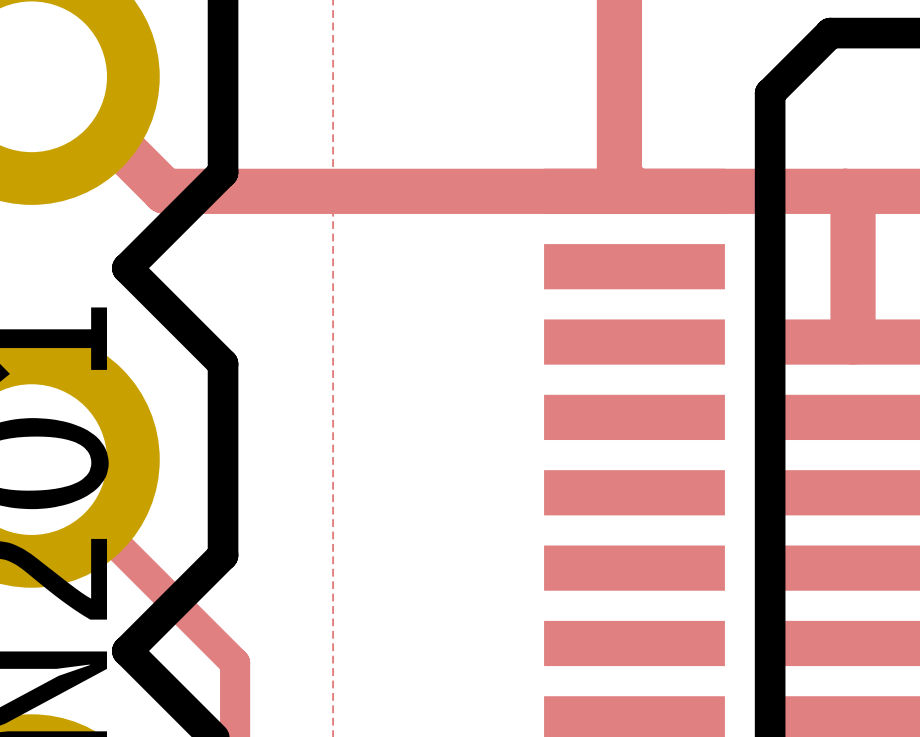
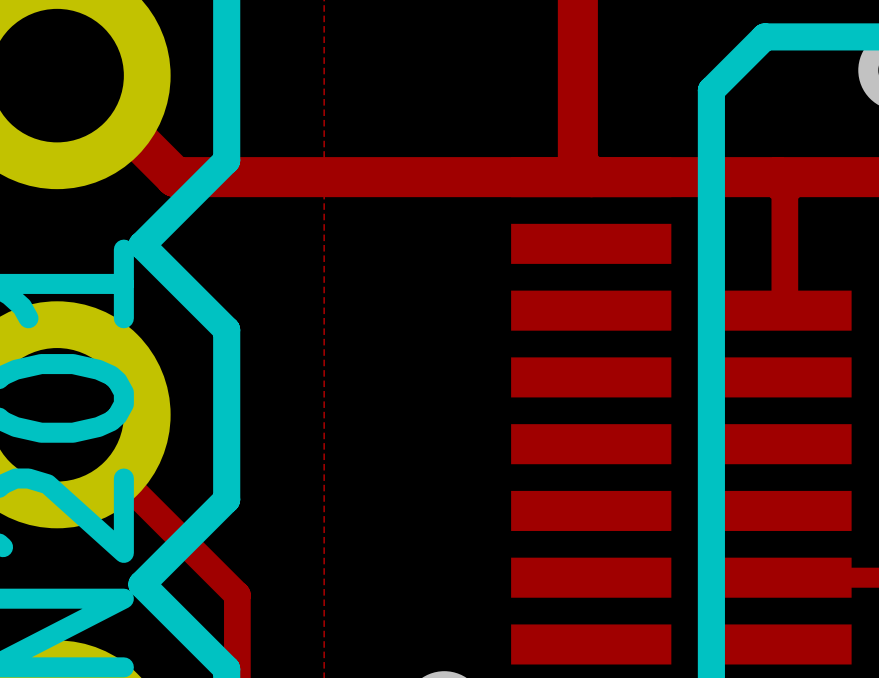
track width: thick (853, 198) (853, 342) -> thin (784, 183) (784, 310)

